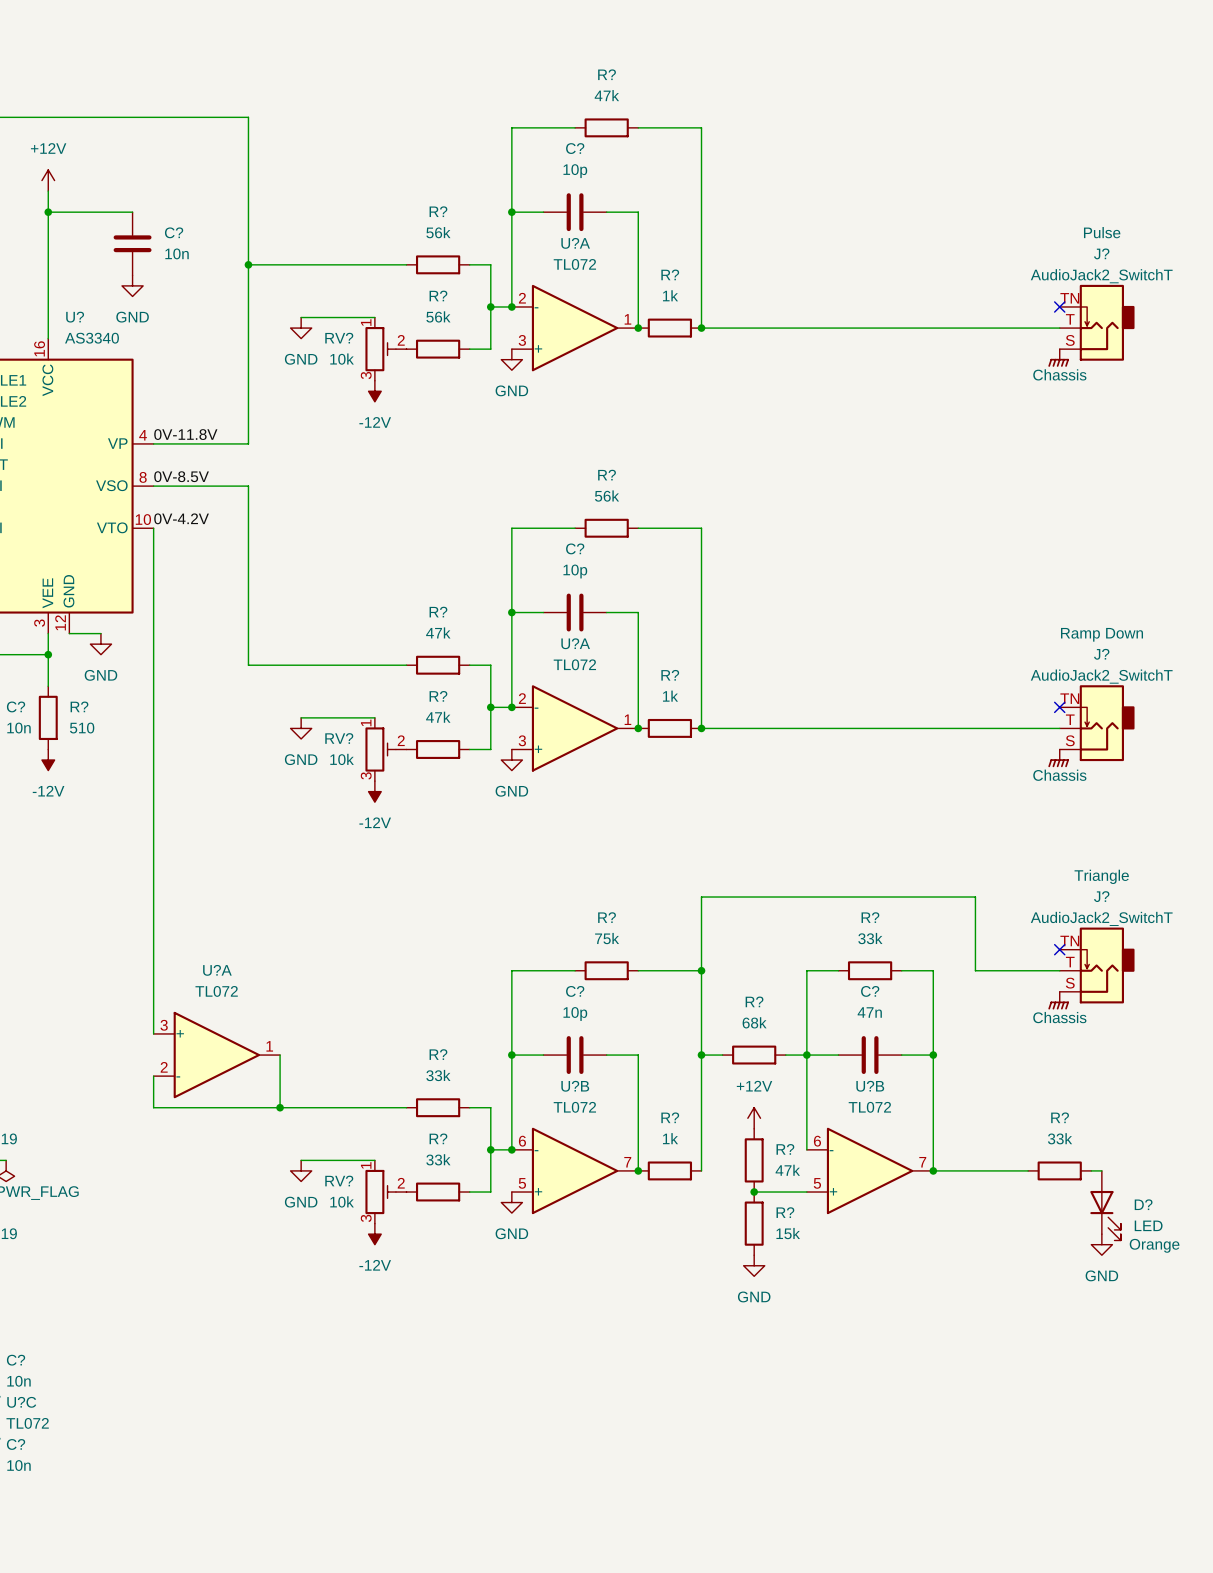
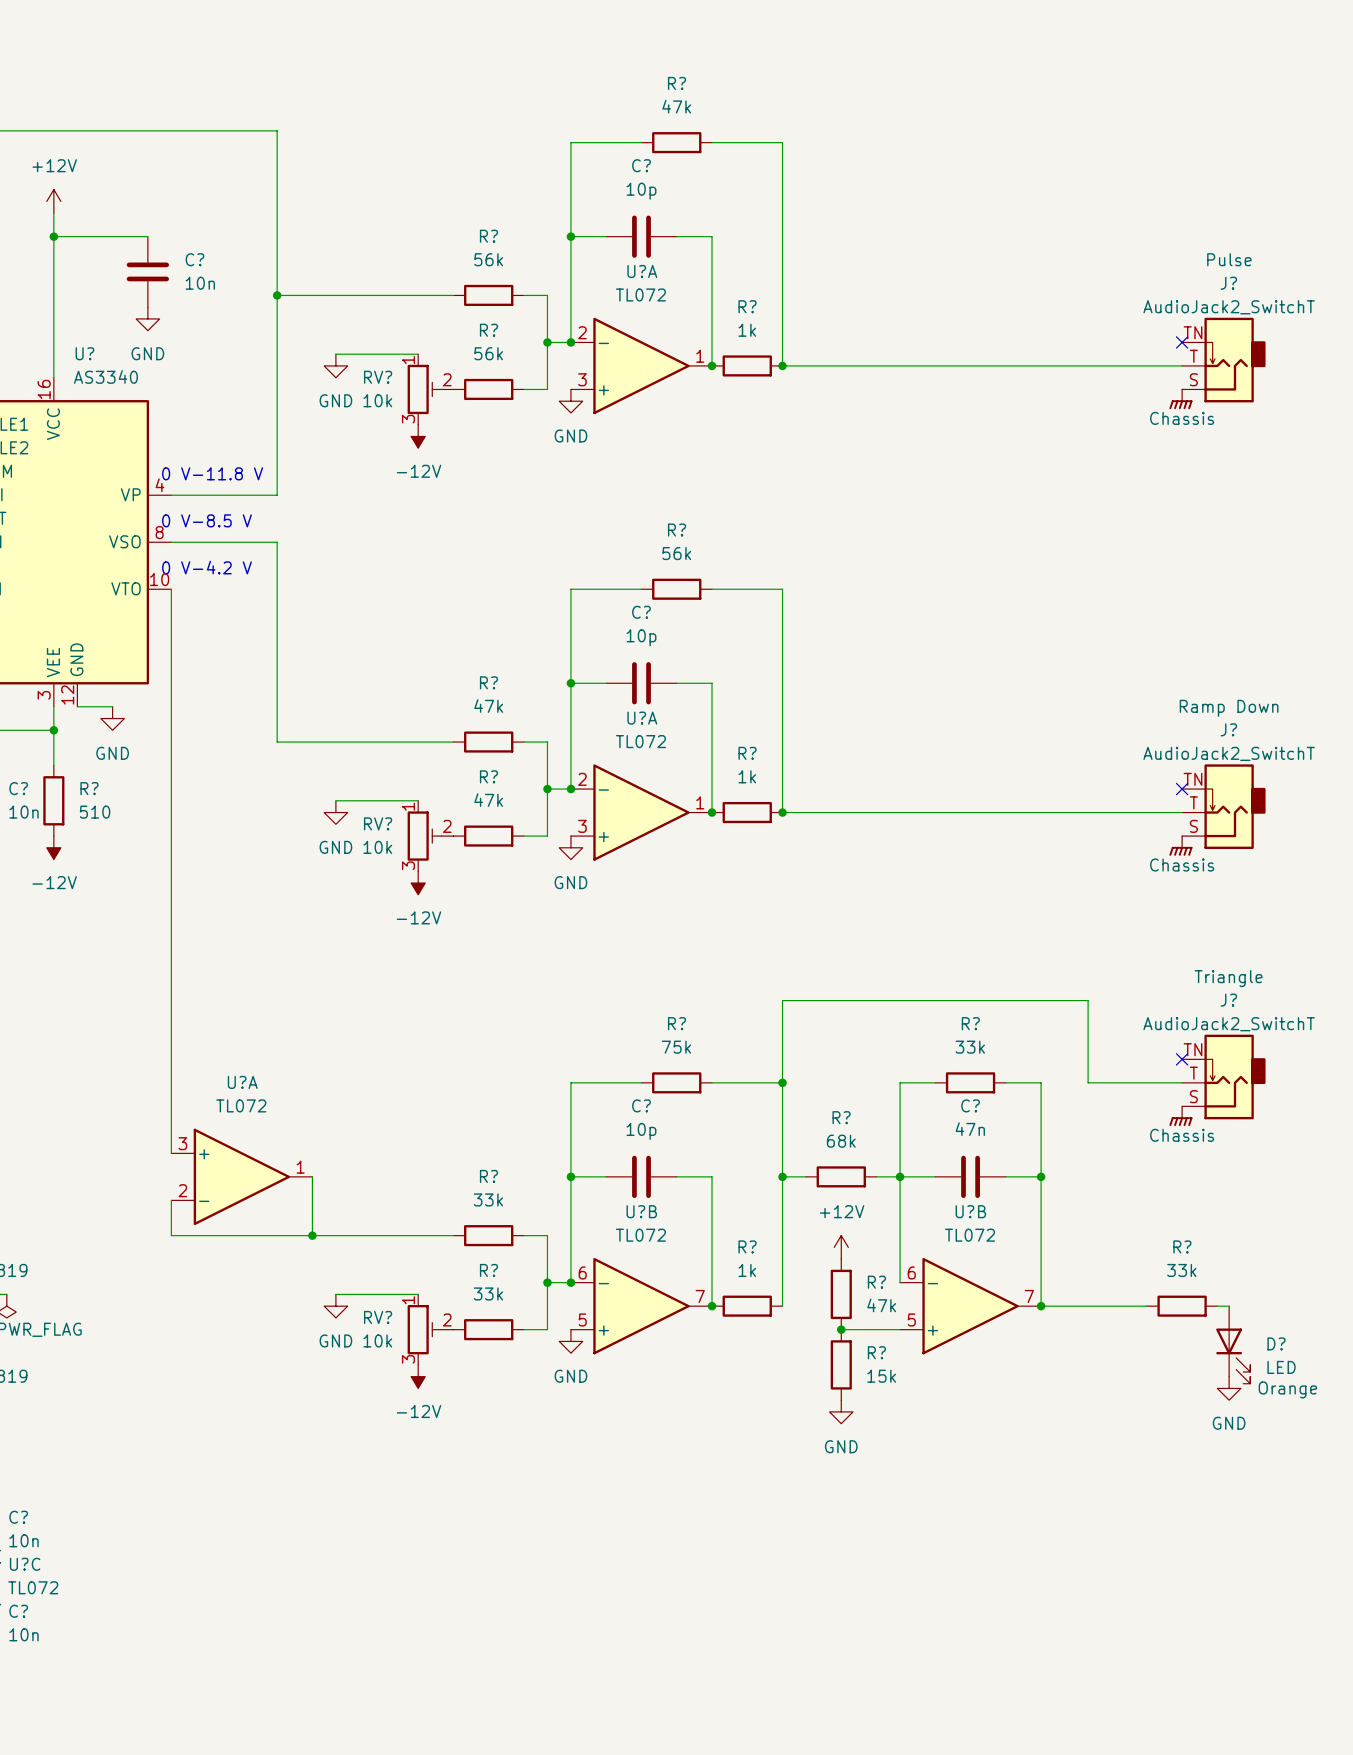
text: none -> 0 V-11.8 V (212, 473)
label: 0V-11.8V (185, 434) -> none
text: none -> 0 V-8.5 V (207, 520)
label: 0V-8.5V (181, 476) -> none
text: none -> 0 V-4.2 V (207, 567)
label: 0V-4.2V (181, 518) -> none

